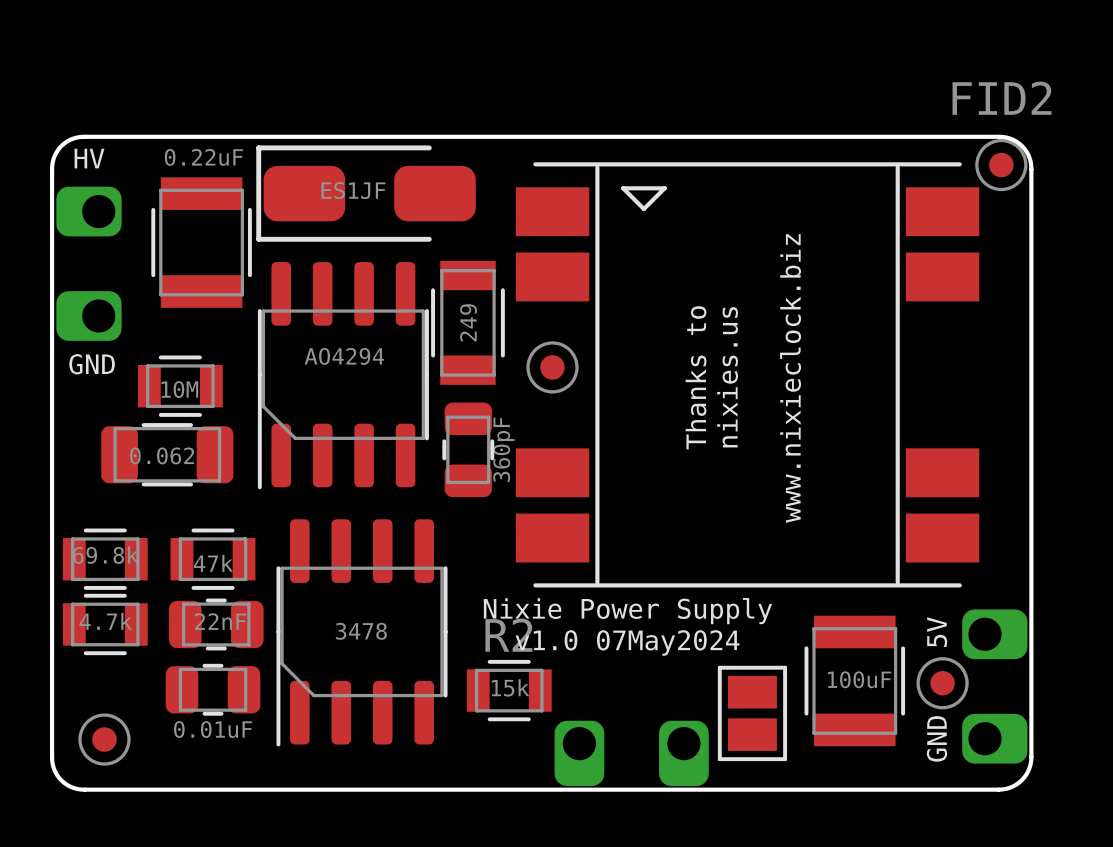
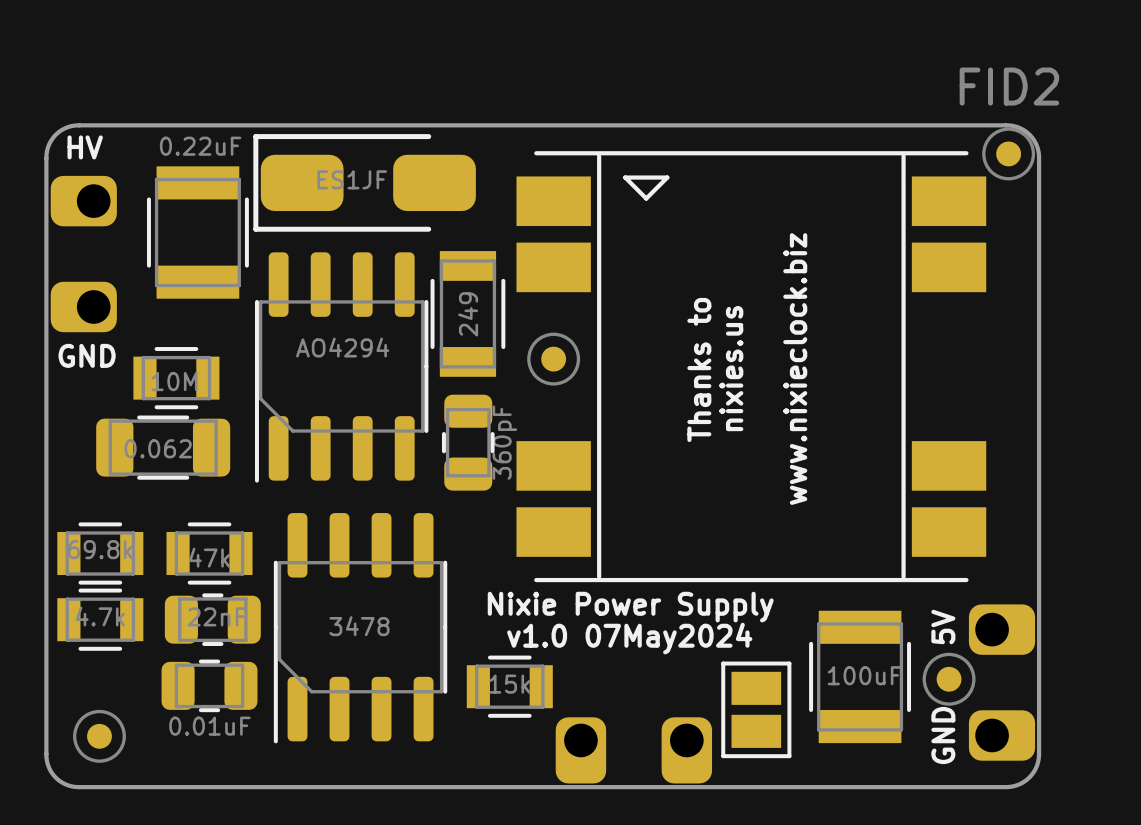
R2 name: R2 (508, 635) -> none

